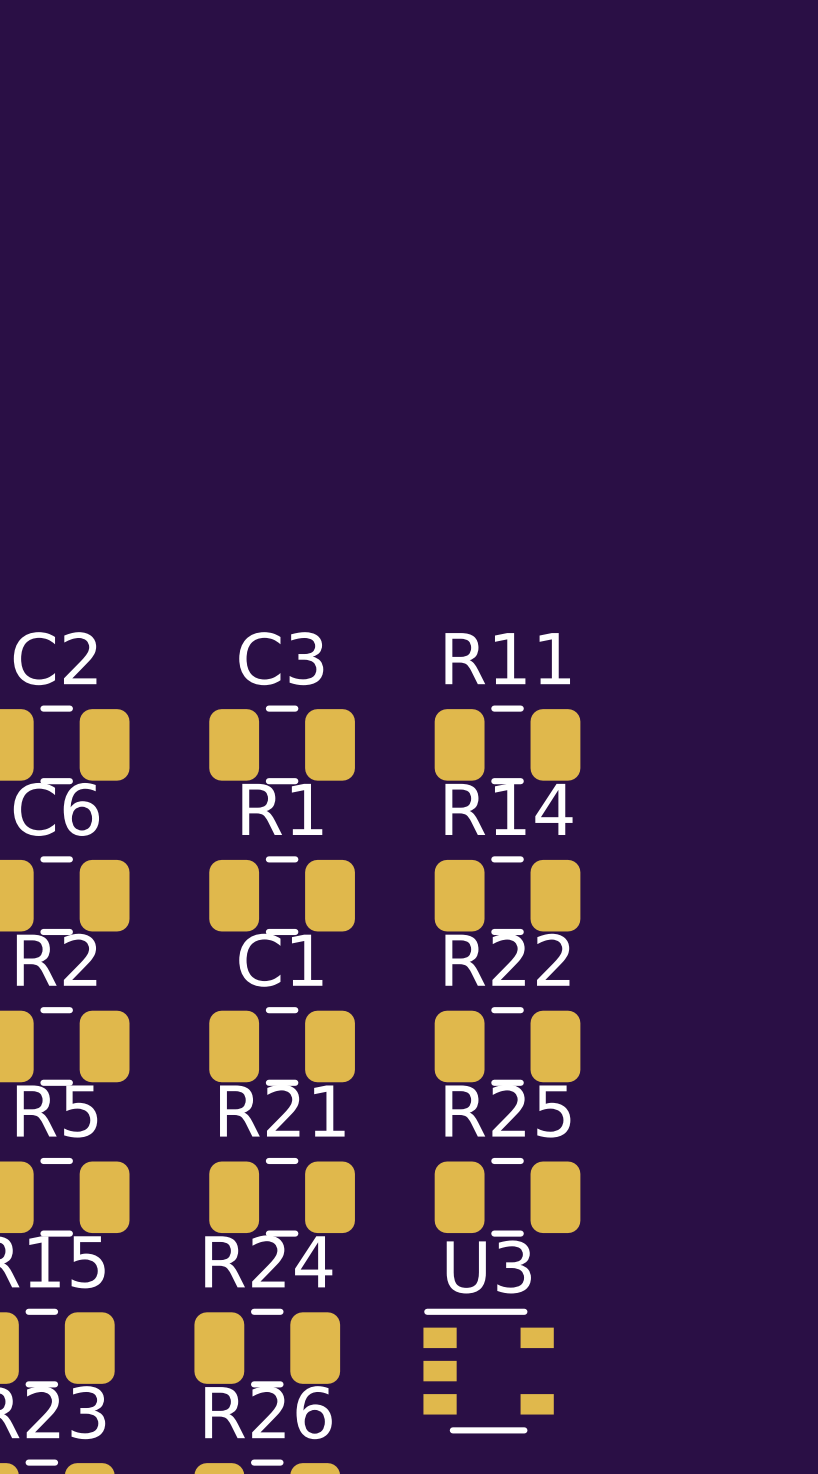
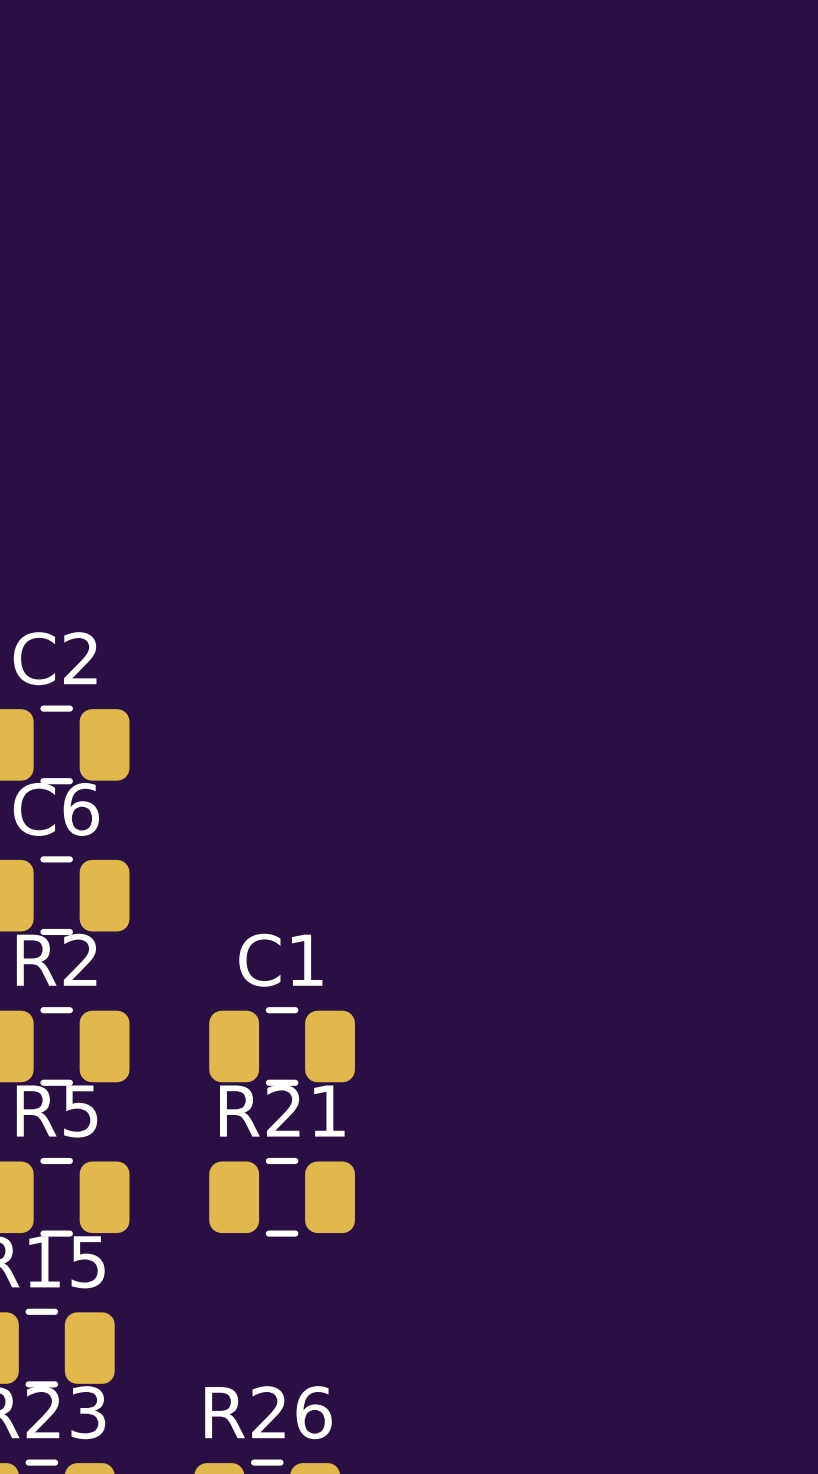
C3: (282, 744) -> none
R11: (507, 744) -> none
R1: (282, 895) -> none
R14: (507, 895) -> none
R22: (507, 1046) -> none
R25: (507, 1197) -> none
R24: (267, 1348) -> none
U3: (488, 1371) -> none

